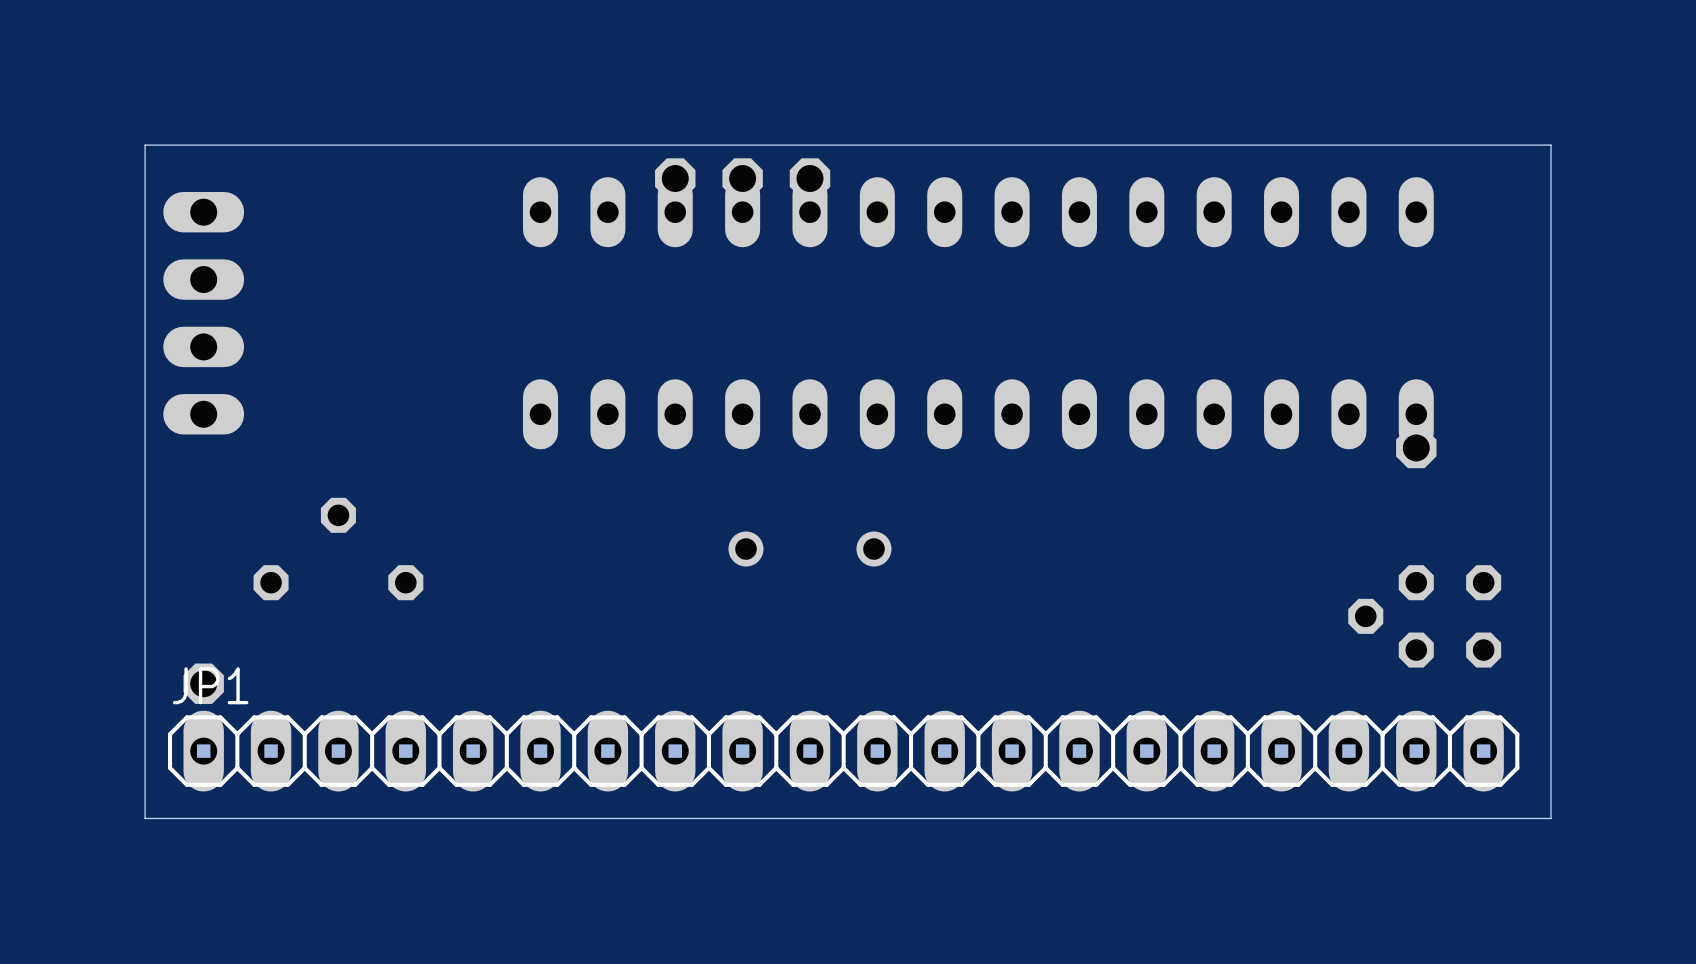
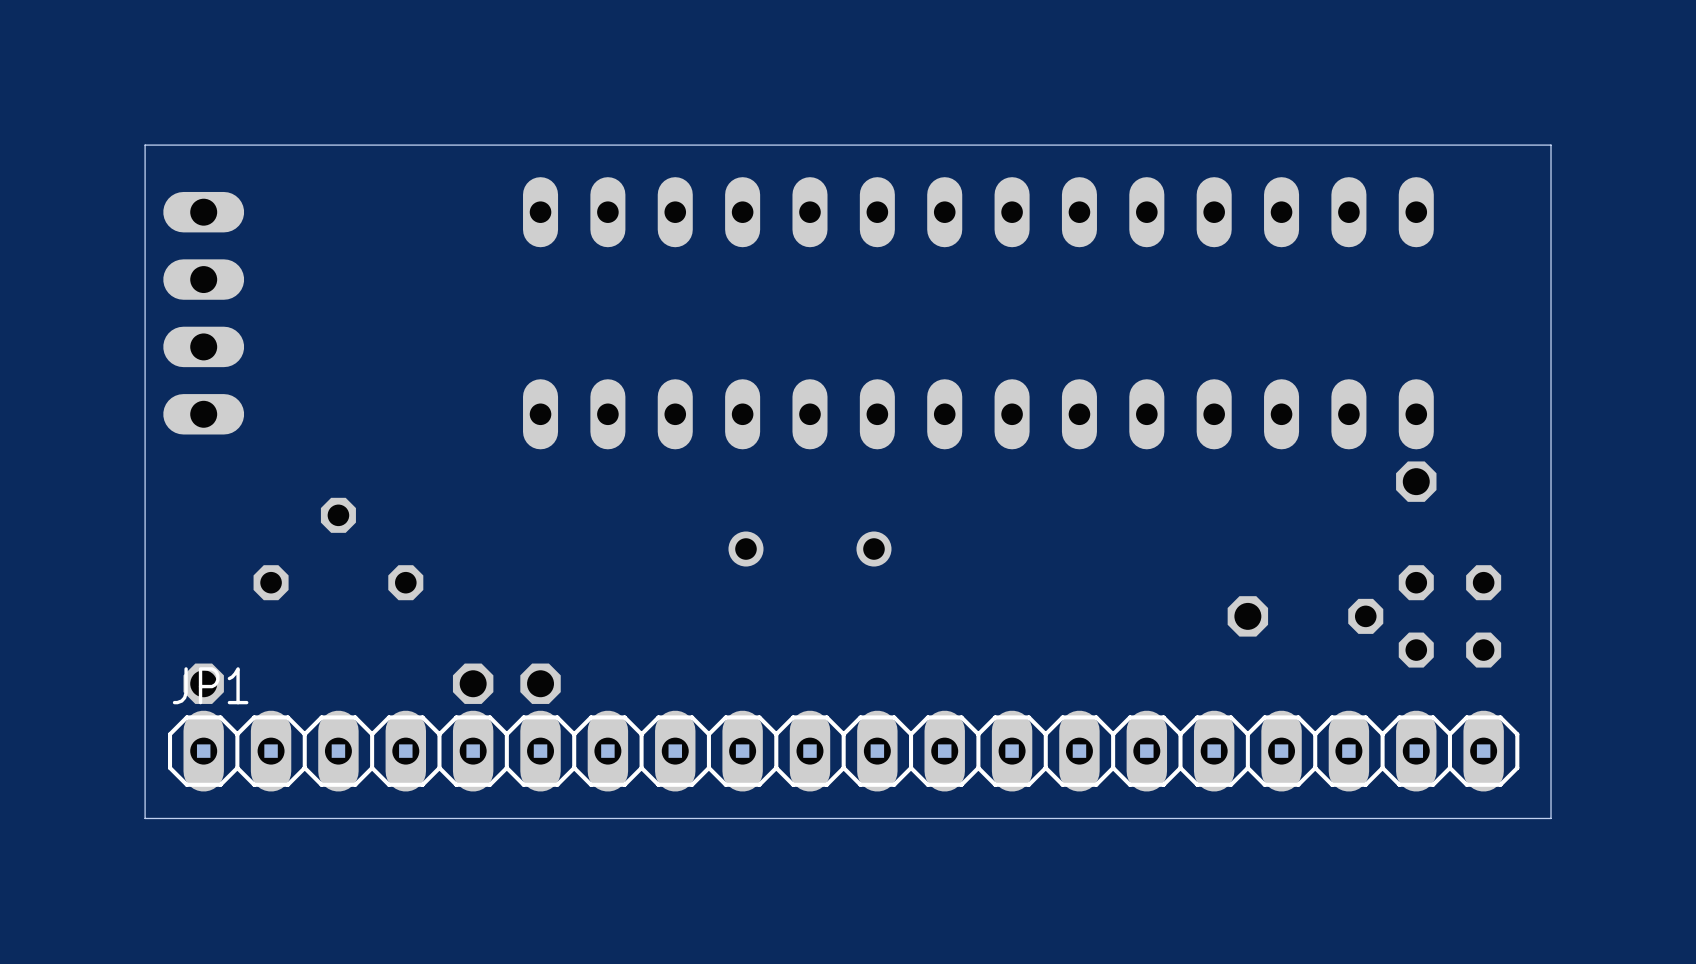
part: (675, 178) -> none
part: (742, 178) -> none
part: (809, 178) -> none
part position: (1416, 447) -> (1416, 481)
part: none -> (1247, 616)
part: none -> (473, 683)
part: none -> (540, 683)

